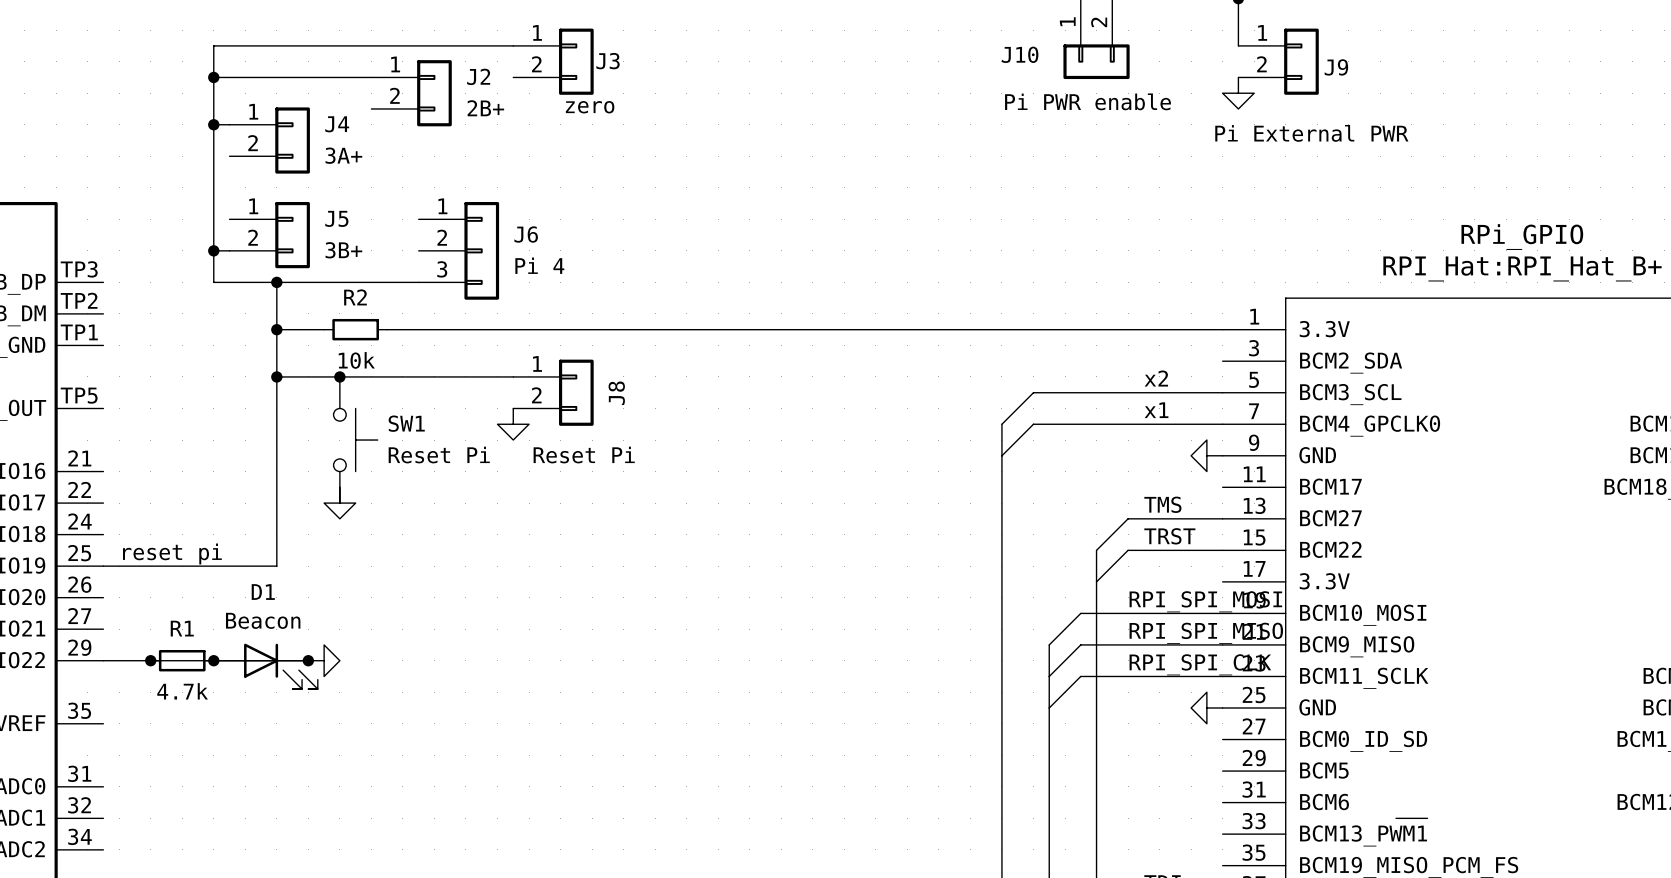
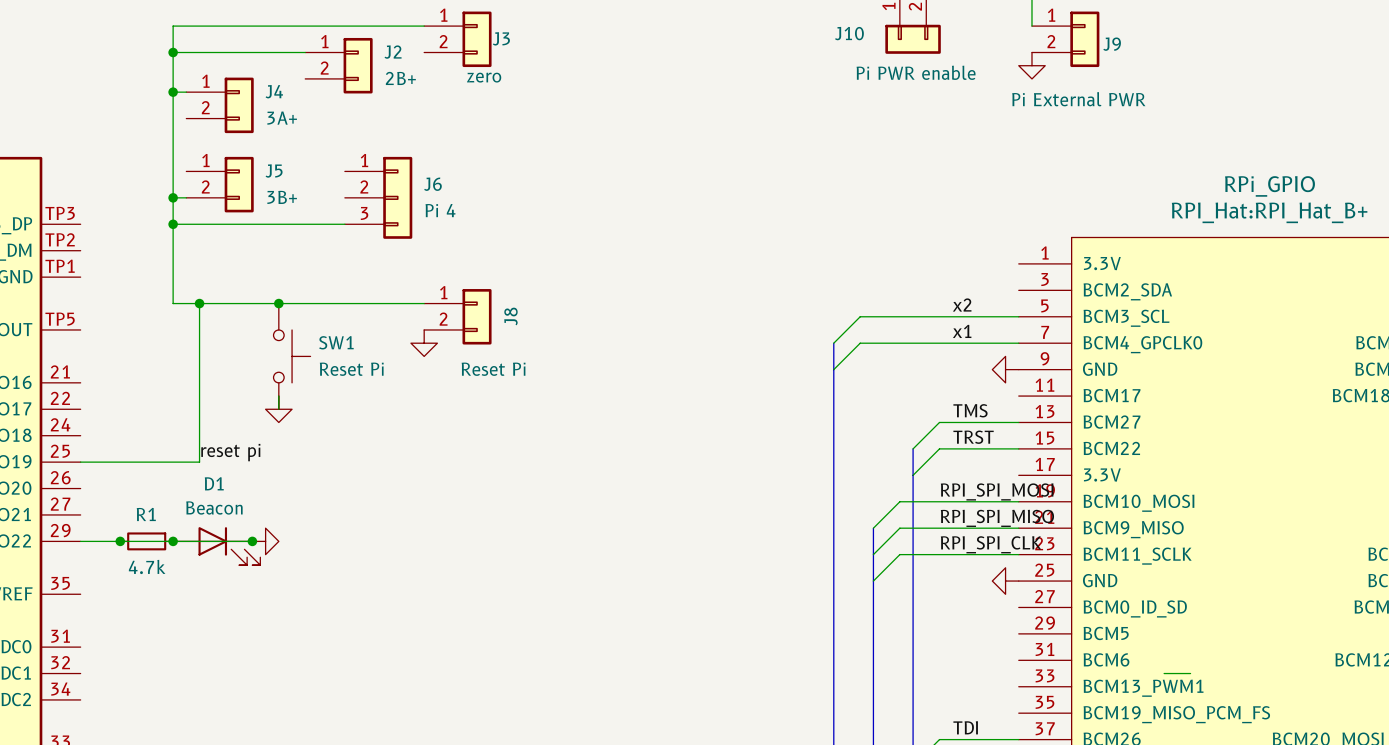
wire: none -> (173, 224) (173, 303) (225, 303)
junction: none -> (173, 224)
wire: (276, 282) (276, 566) (245, 566) -> (199, 303) (199, 462)
junction: (276, 282) -> none
wire: (276, 329) (324, 329) -> none
junction: (276, 329) -> none
R2: 10k (355, 329) -> none
wire: (387, 329) (1222, 329) -> none
junction: none -> (199, 303)
junction: (276, 376) -> none
label position: reset pi (172, 553) -> reset pi (230, 452)

